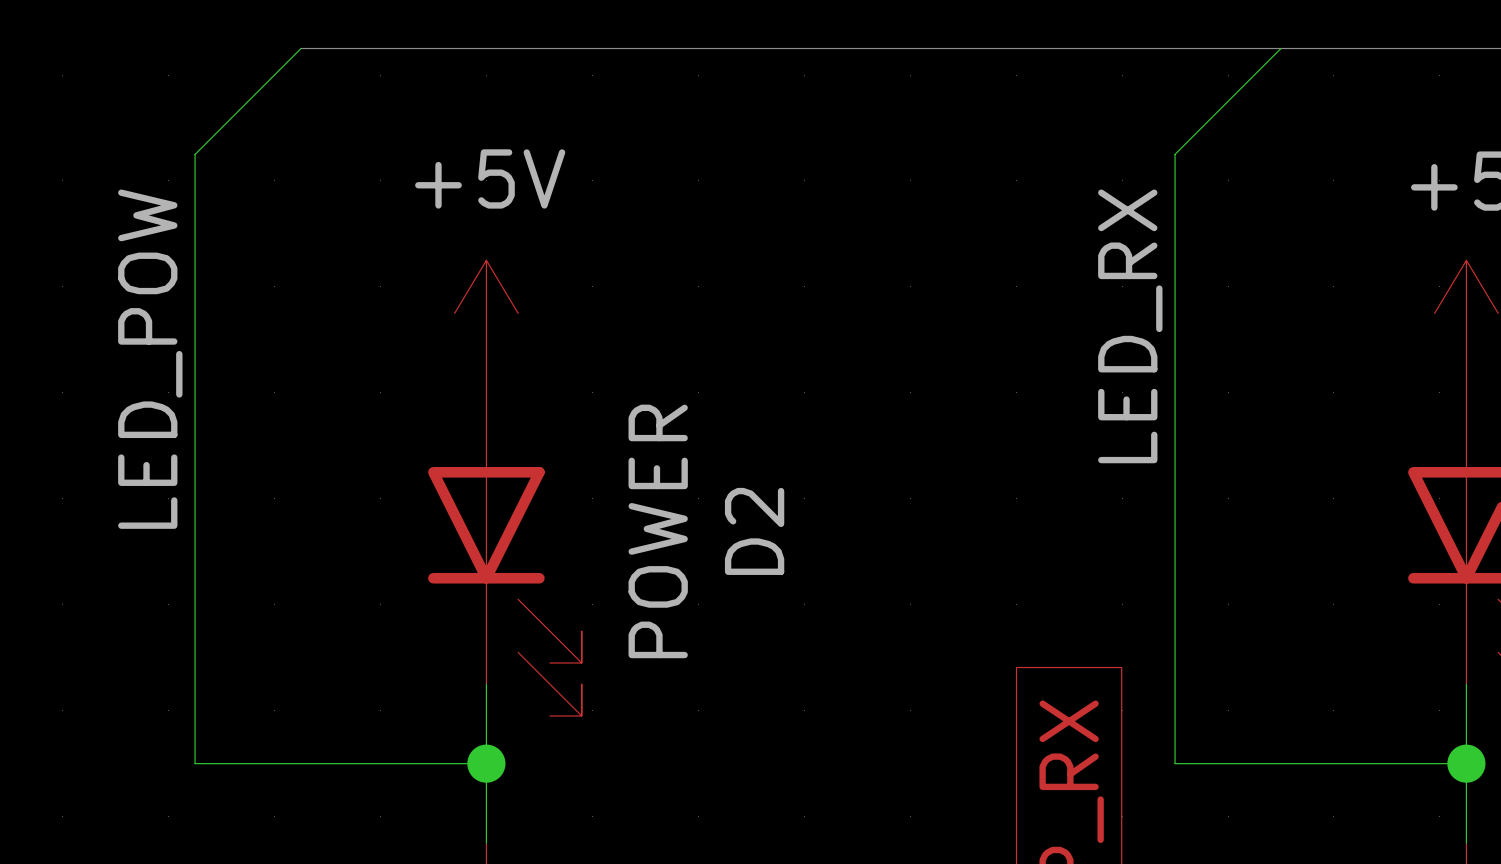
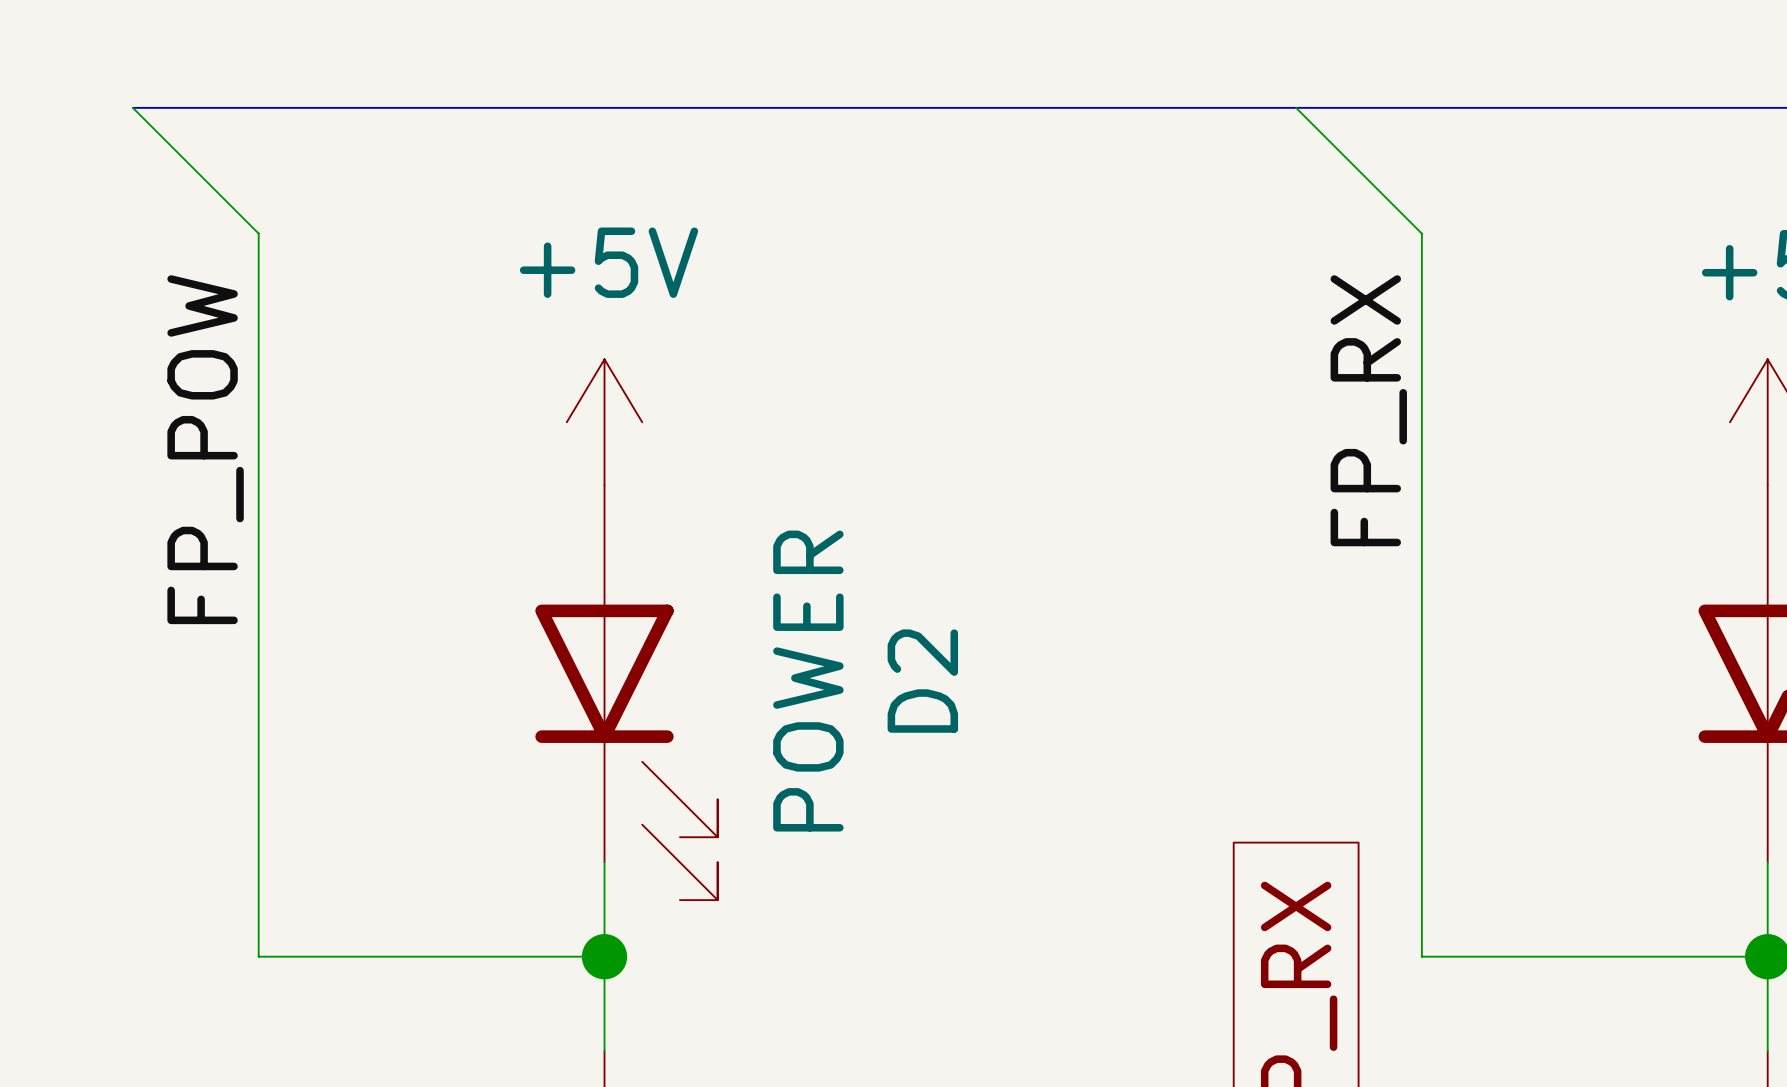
bus: none -> (132, 107) (384, 107)
wire: (301, 48) (195, 154) -> (132, 107) (258, 233)
wire: (1281, 48) (1175, 154) -> (1296, 107) (1421, 233)
label: LED_RX (1130, 326) -> FP_RX (1368, 410)
label: LED_POW (150, 359) -> FP_POW (205, 449)

